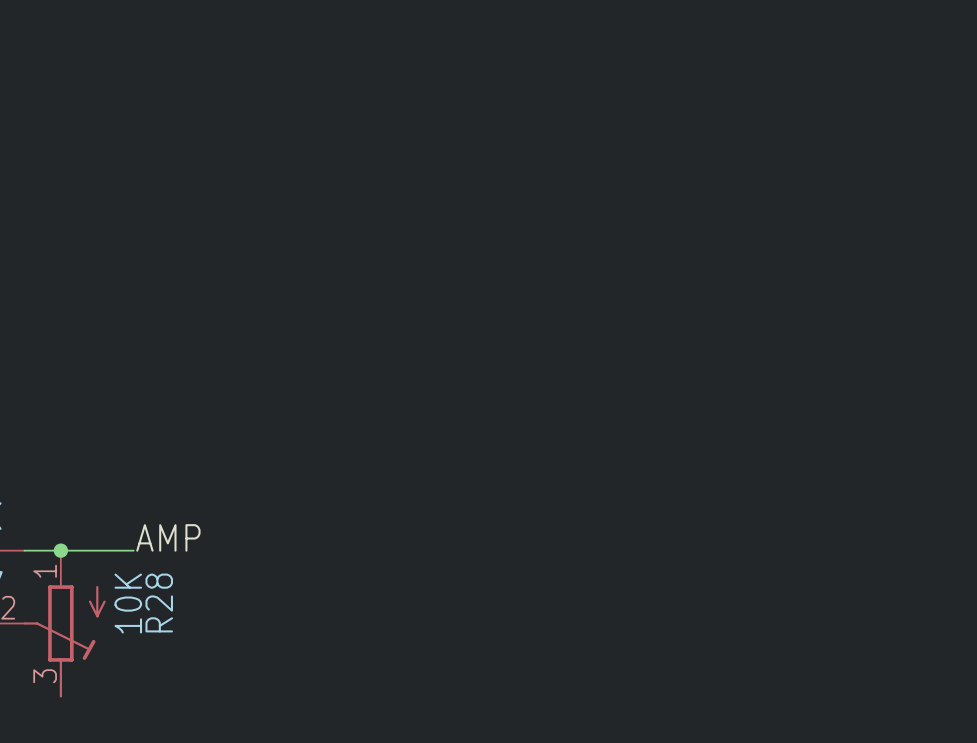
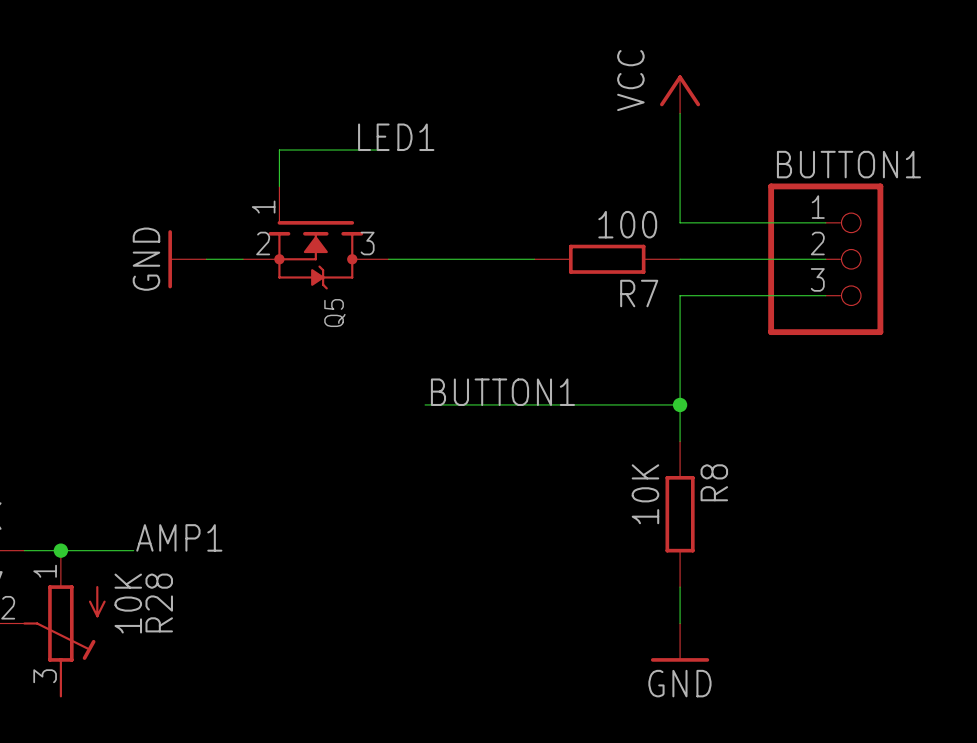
power symbol: none -> VCC (680, 94)
wire: none -> (680, 113) (680, 222) (825, 222)
label: none -> LED1 (396, 137)
wire: none -> (388, 150) (279, 150) (279, 186)
Q5: none -> (315, 237)
power symbol: none -> GND (187, 259)
wire: none -> (206, 259) (242, 259)
wire: none -> (388, 259) (534, 259)
R7: none -> 100 (607, 259)
wire: none -> (680, 259) (825, 259)
BUTTON1: none -> (825, 259)
wire: none -> (825, 295) (680, 295) (680, 441)
label: none -> BUTTON1 (502, 392)
wire: none -> (425, 404) (680, 404)
junction: none -> (680, 404)
R8: none -> 10K (680, 514)
label: AMP (168, 537) -> AMP1 (179, 537)
wire: none -> (680, 587) (680, 623)
power symbol: none -> GND (680, 642)

